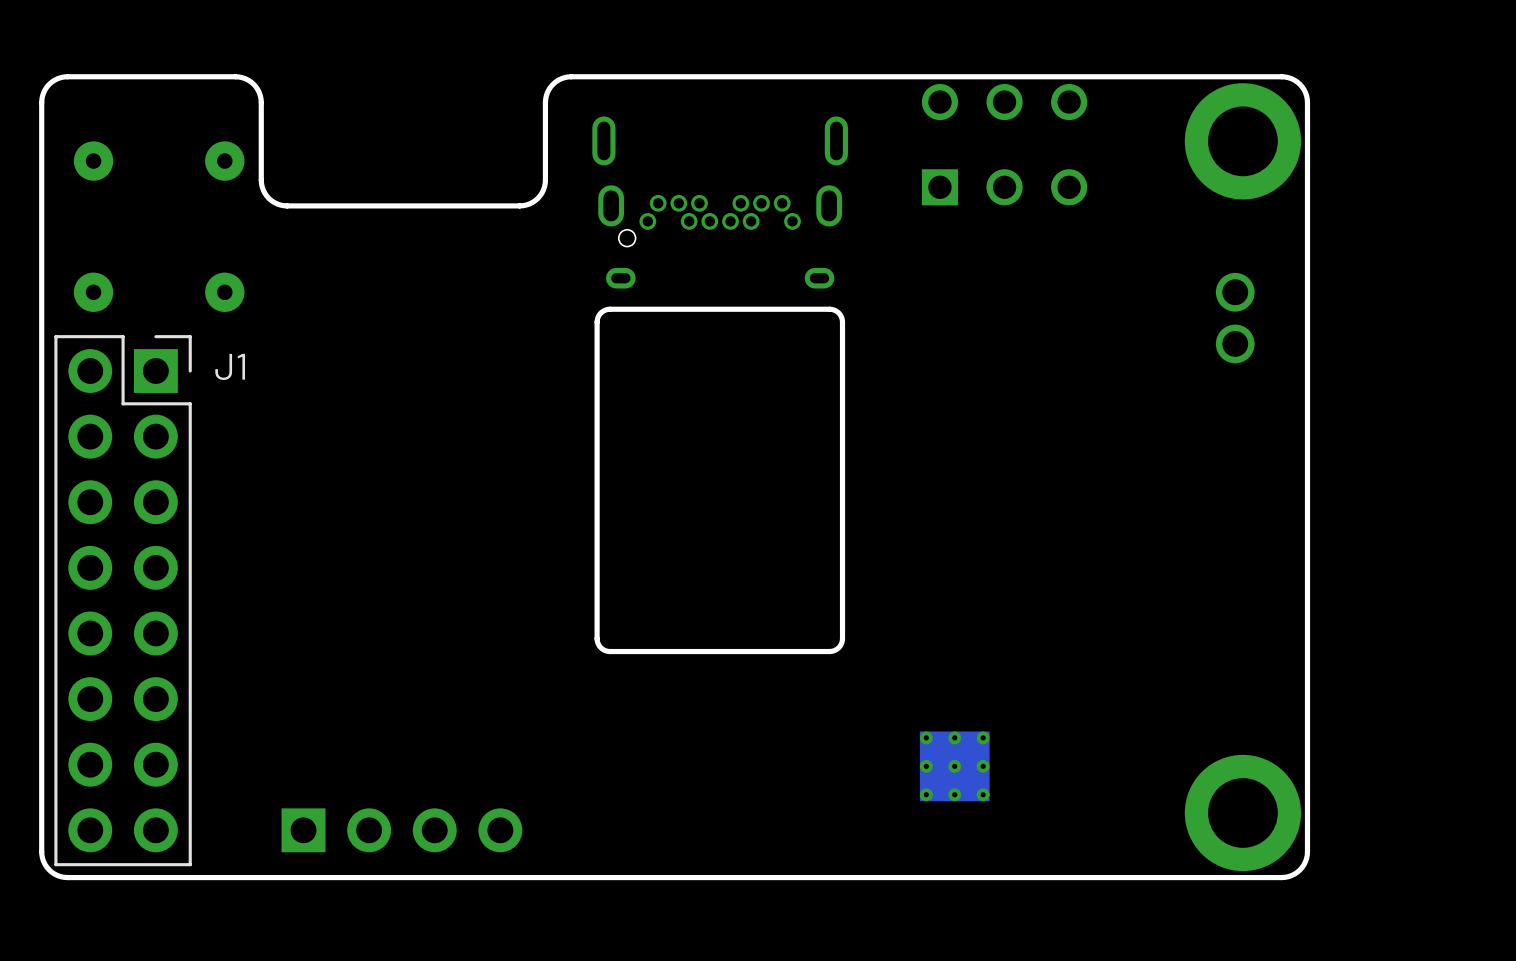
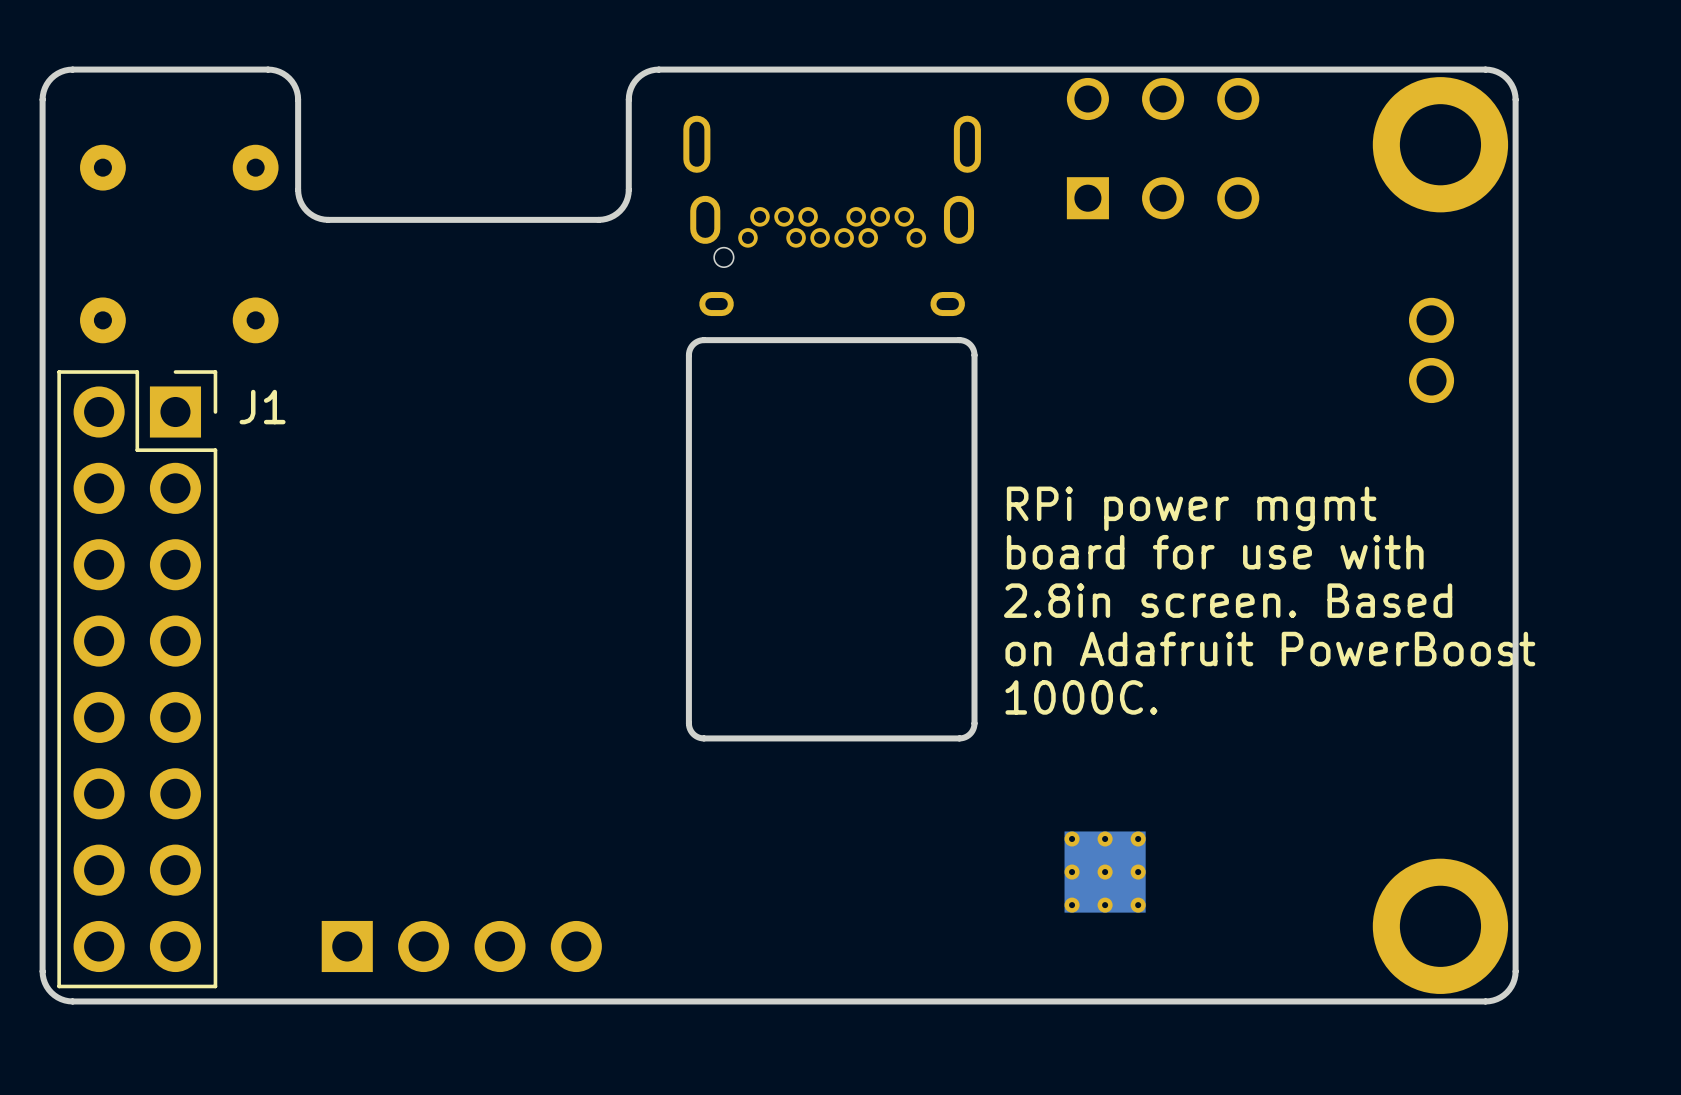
text: none -> RPi power mgmt (1191, 508)
text: none -> board for use with (1215, 552)
text: none -> 2.8in screen. Based (1228, 600)
text: none -> on Adafruit PowerBoost (1270, 649)
text: none -> 1000C. (1081, 697)

